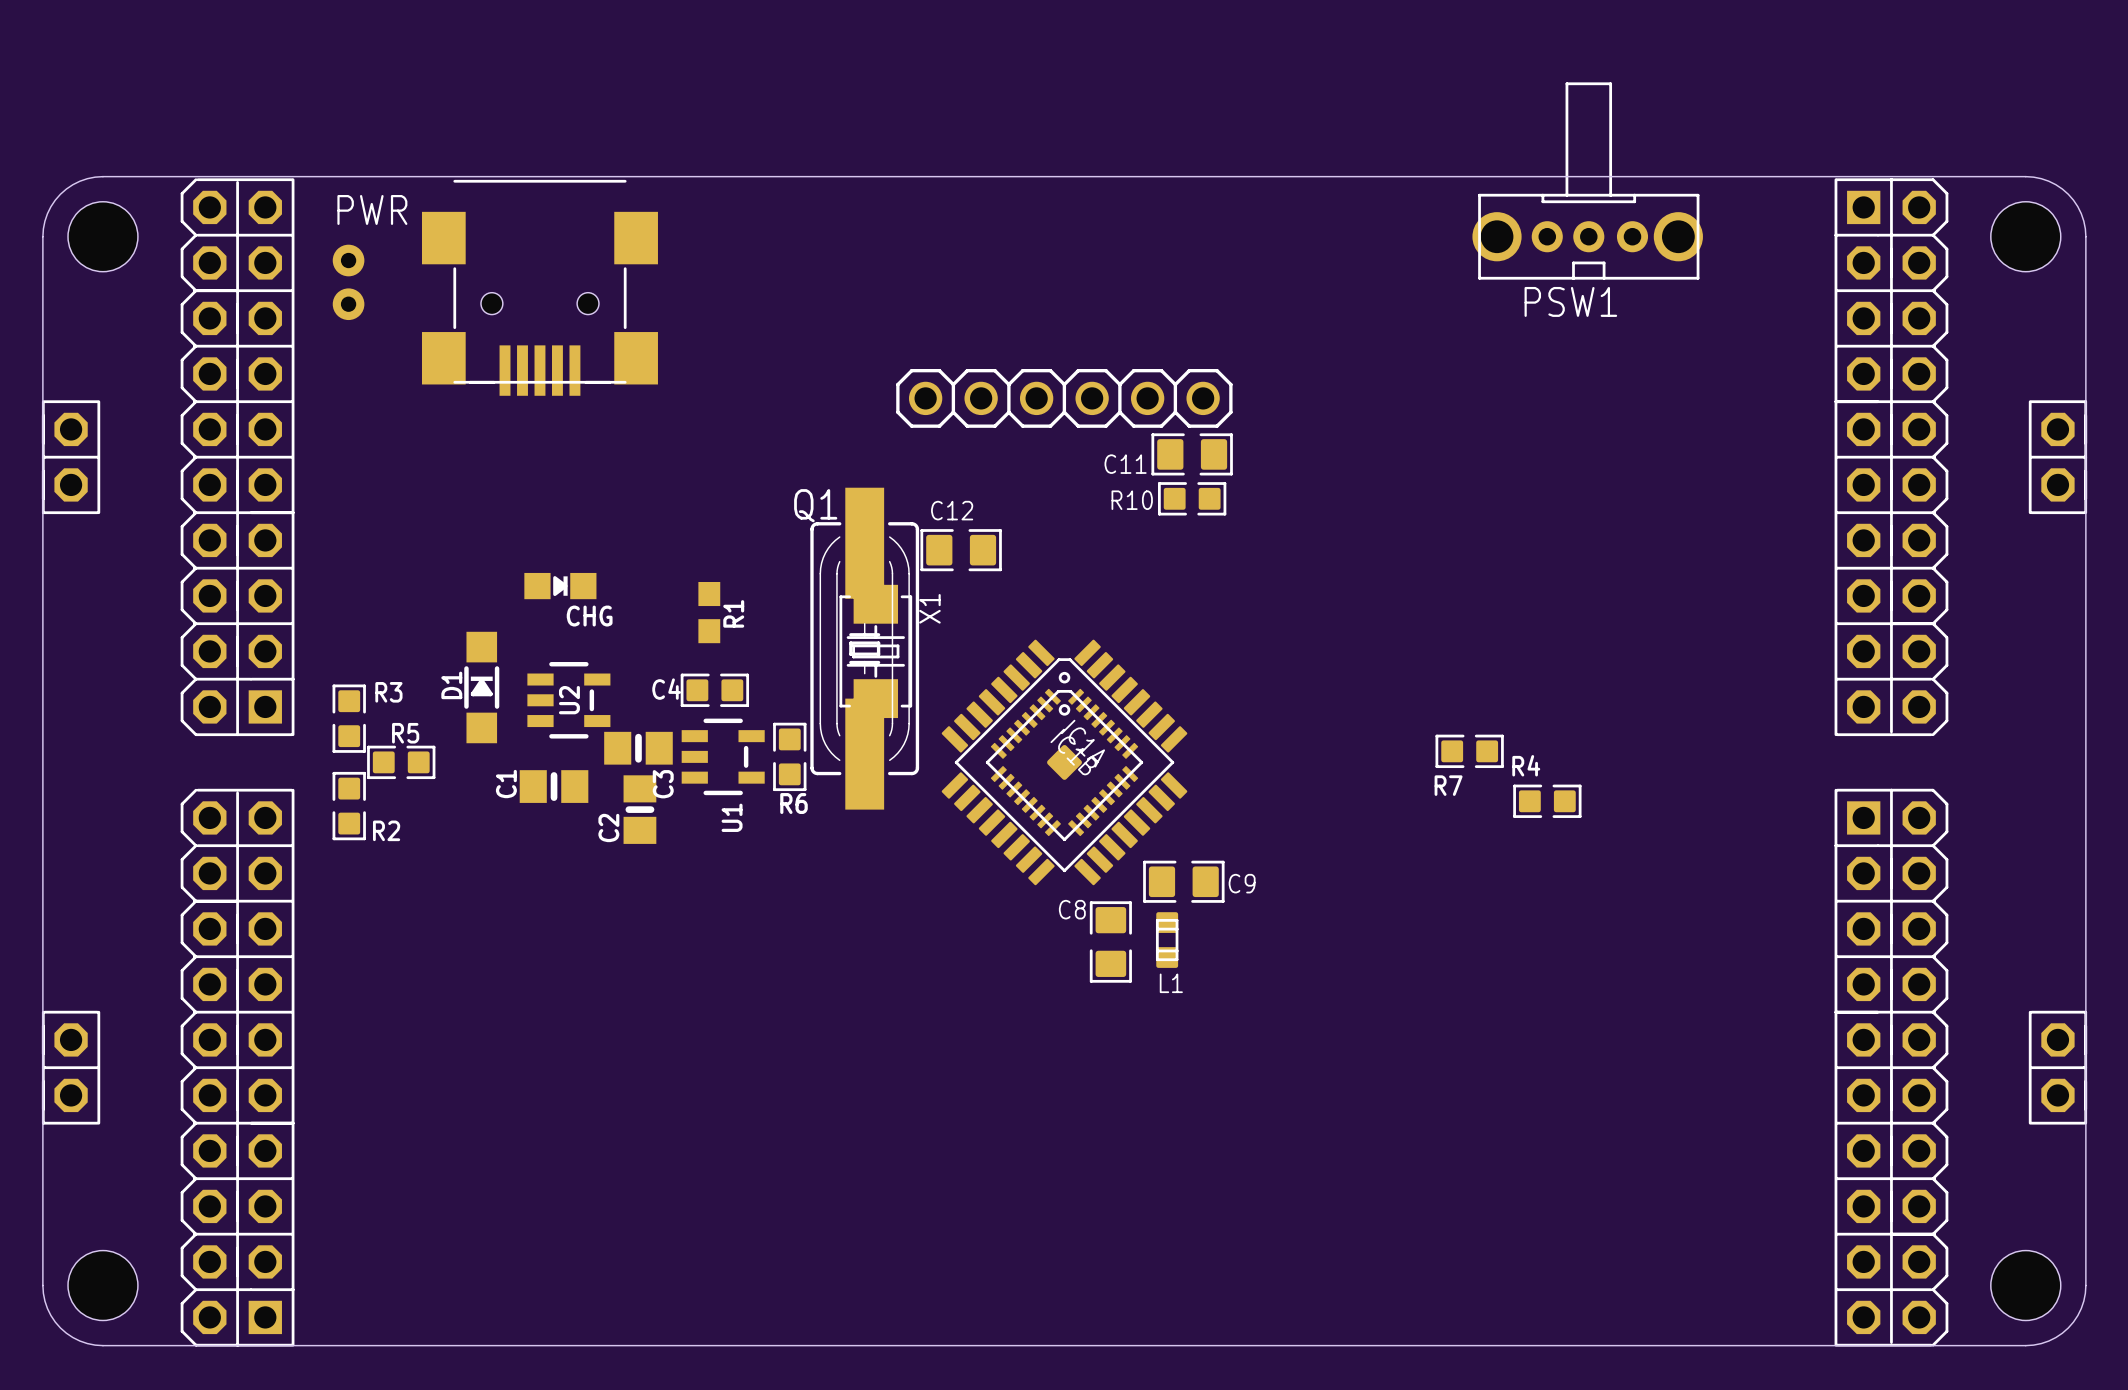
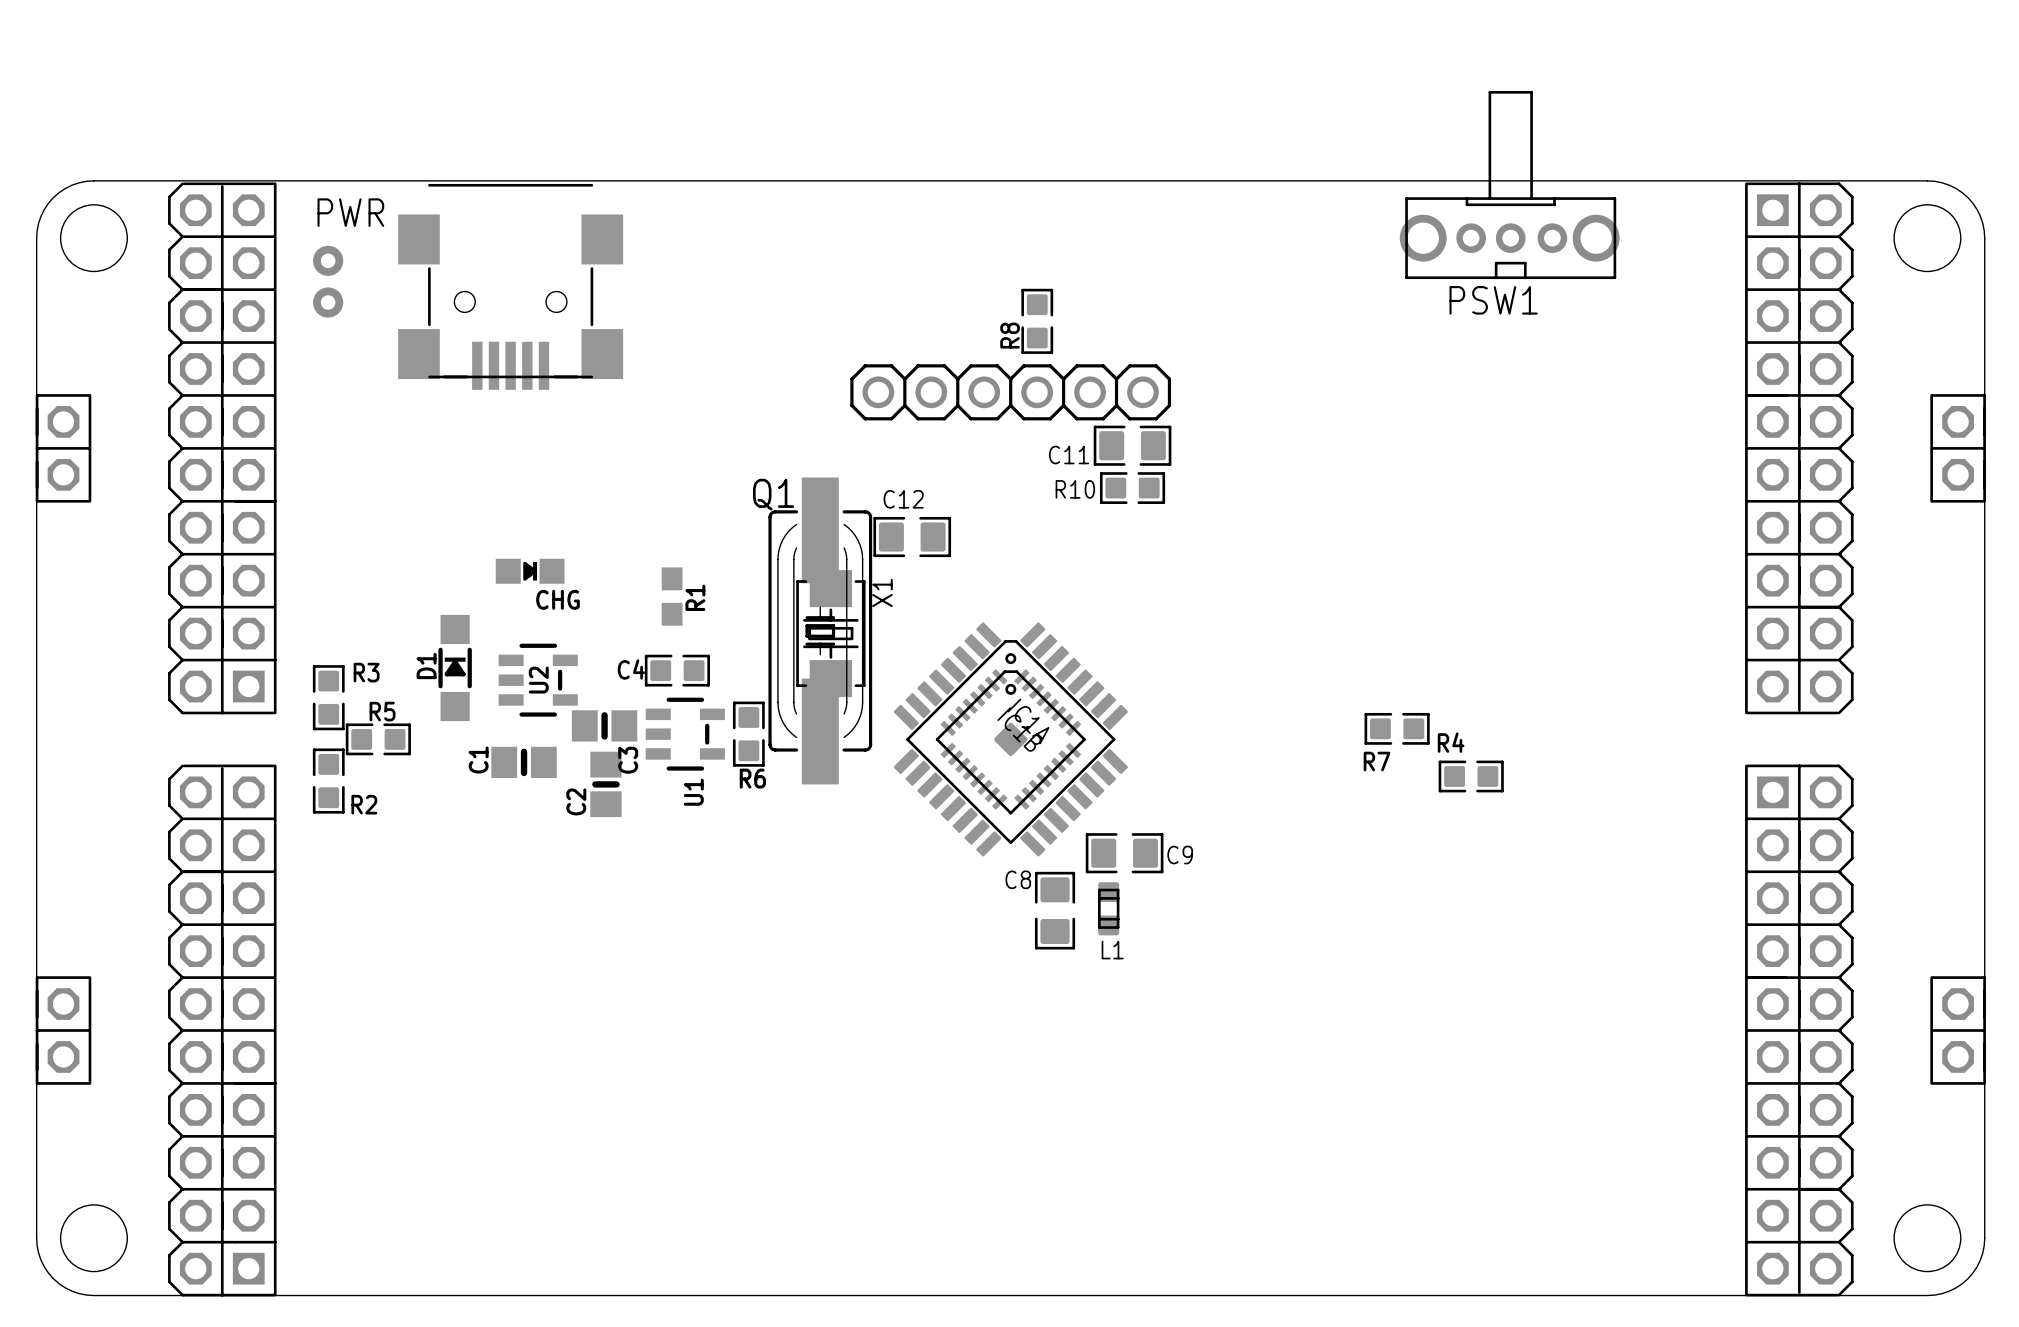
R8: none -> (1037, 321)

